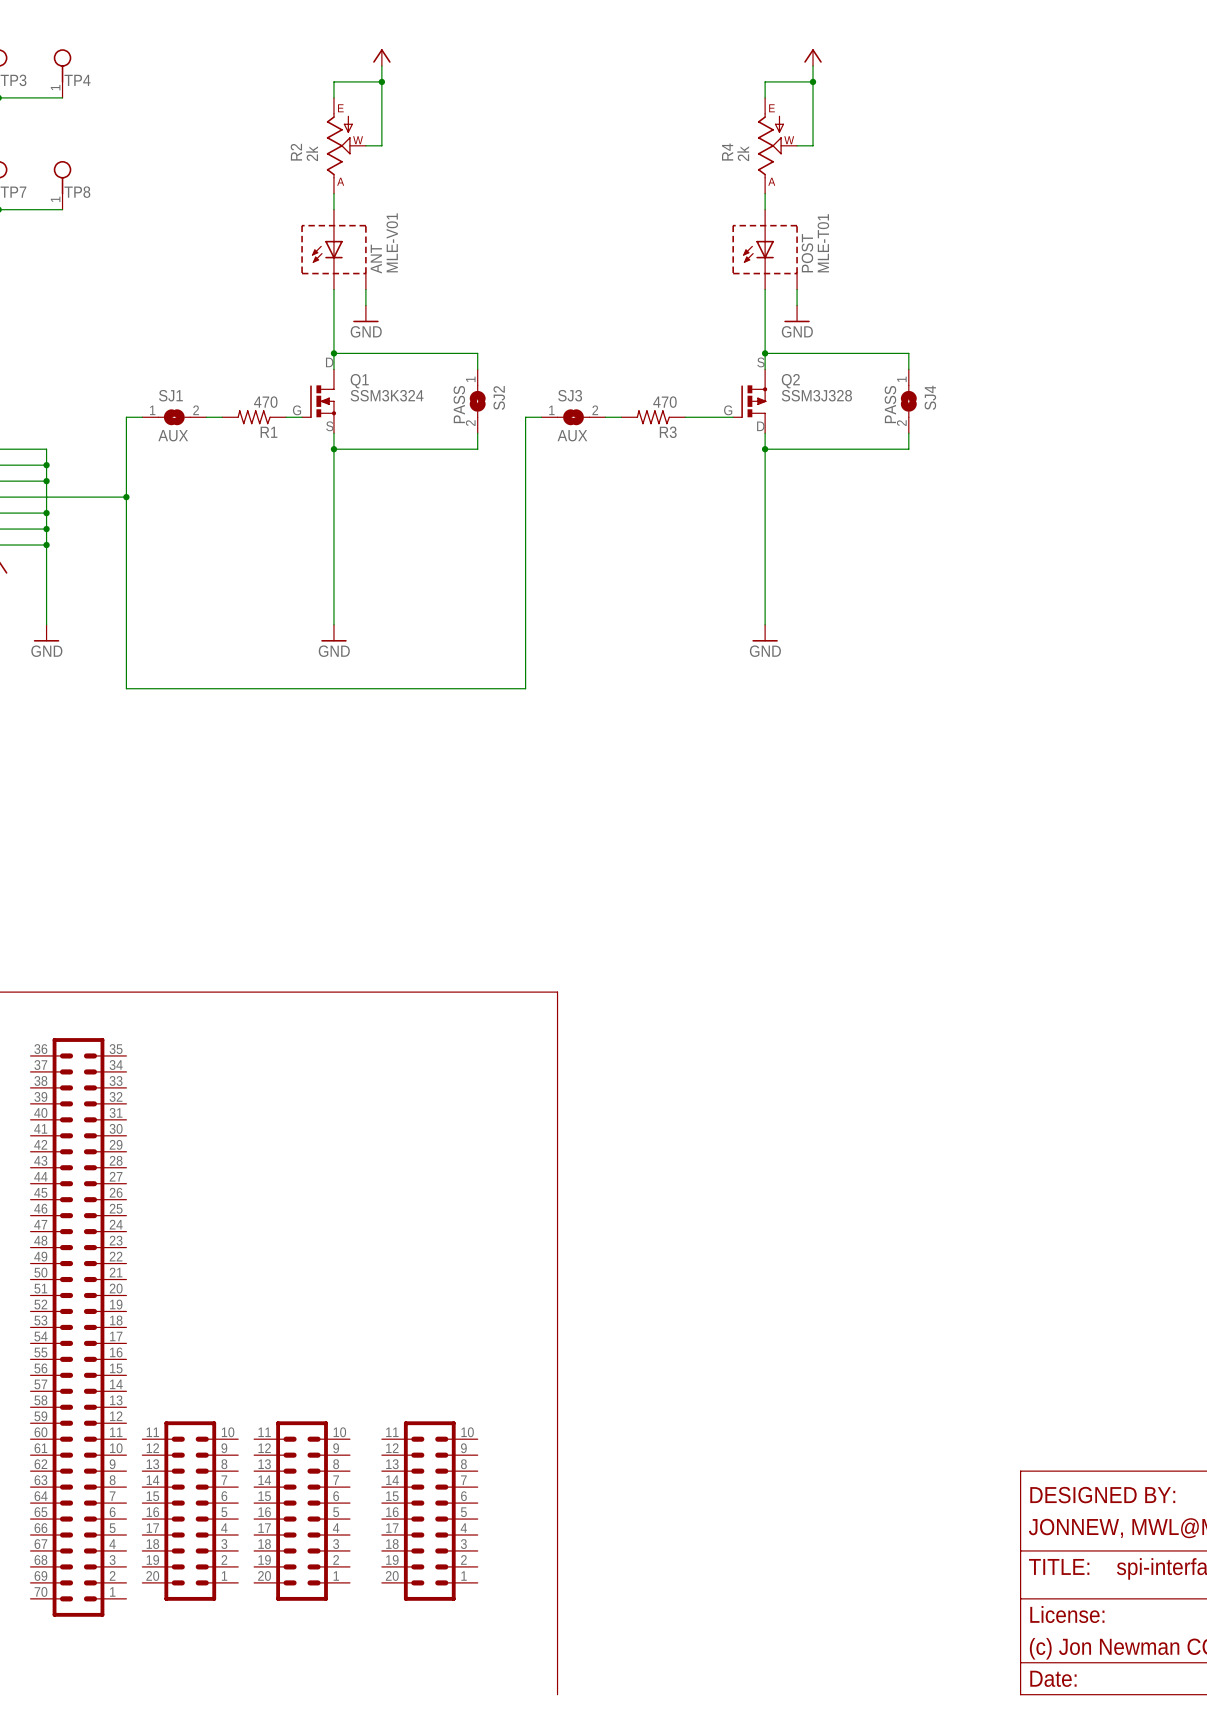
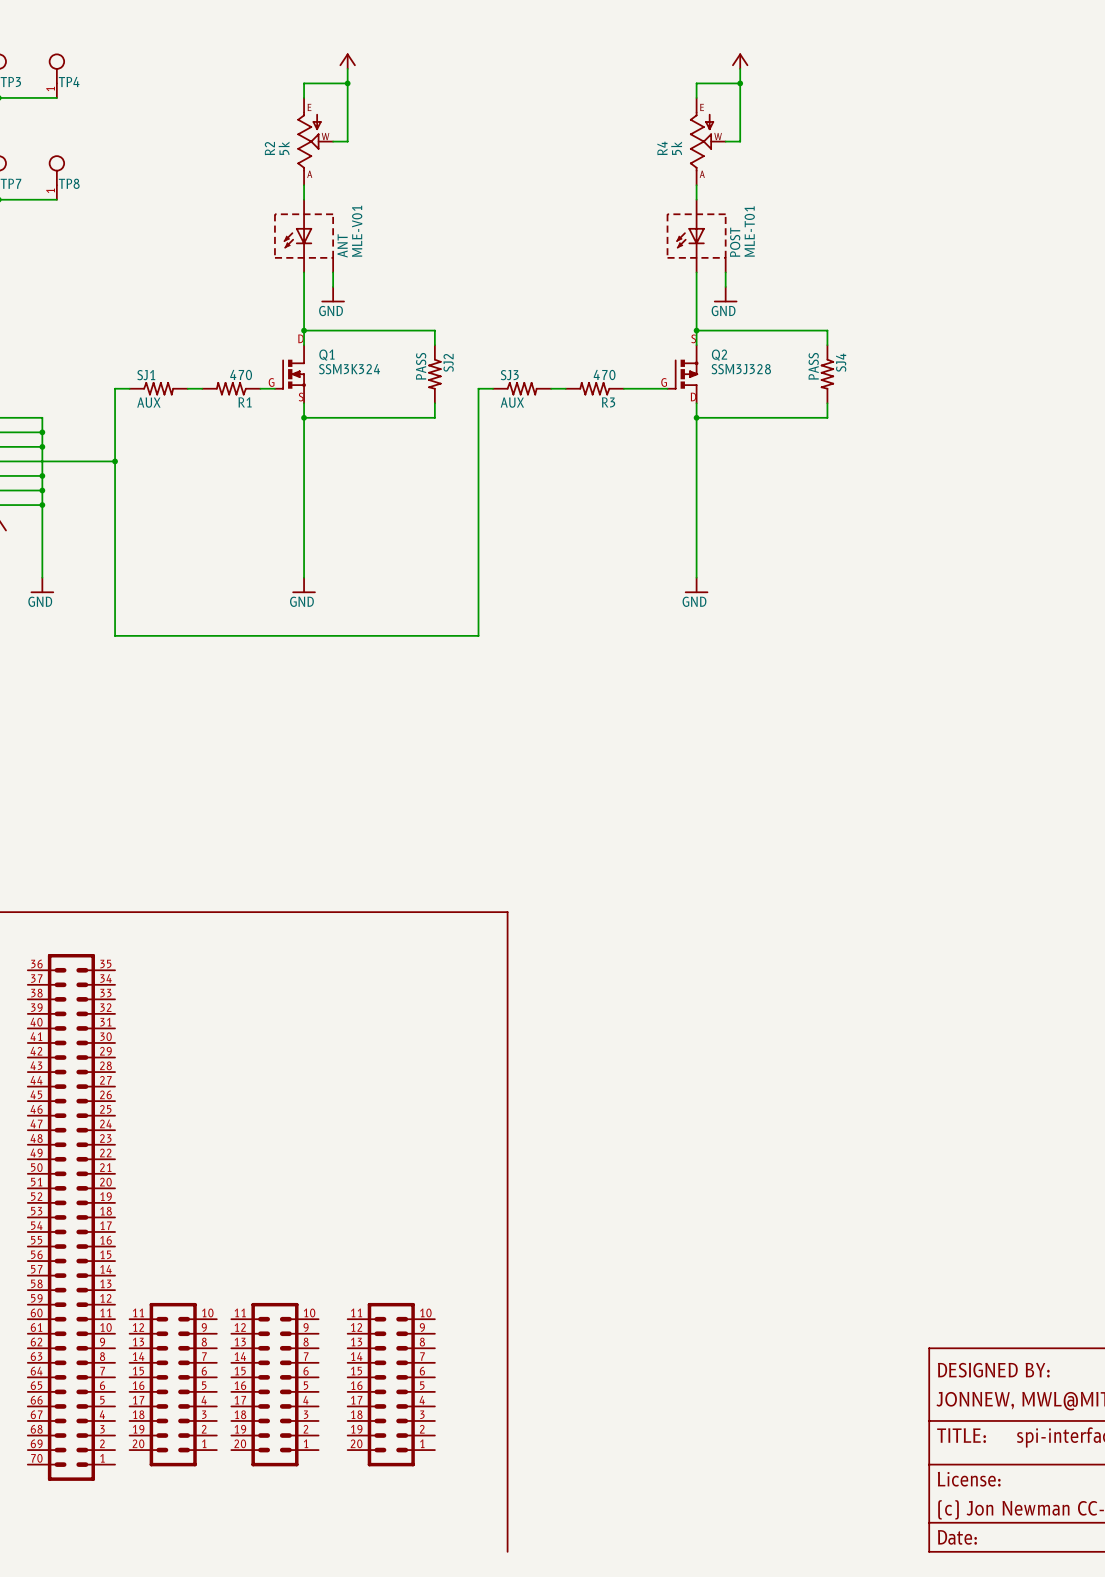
R2 value: 2k (312, 153) -> 5k (284, 148)
R4 value: 2k (743, 153) -> 5k (676, 148)
SJ2 symbol: [469, 369, 486, 434] -> [428, 345, 442, 404]
SJ4 symbol: [900, 369, 917, 434] -> [821, 345, 834, 404]
SJ1 symbol: [142, 409, 207, 426] -> [129, 382, 188, 396]
SJ3 symbol: [541, 409, 606, 426] -> [493, 382, 552, 396]

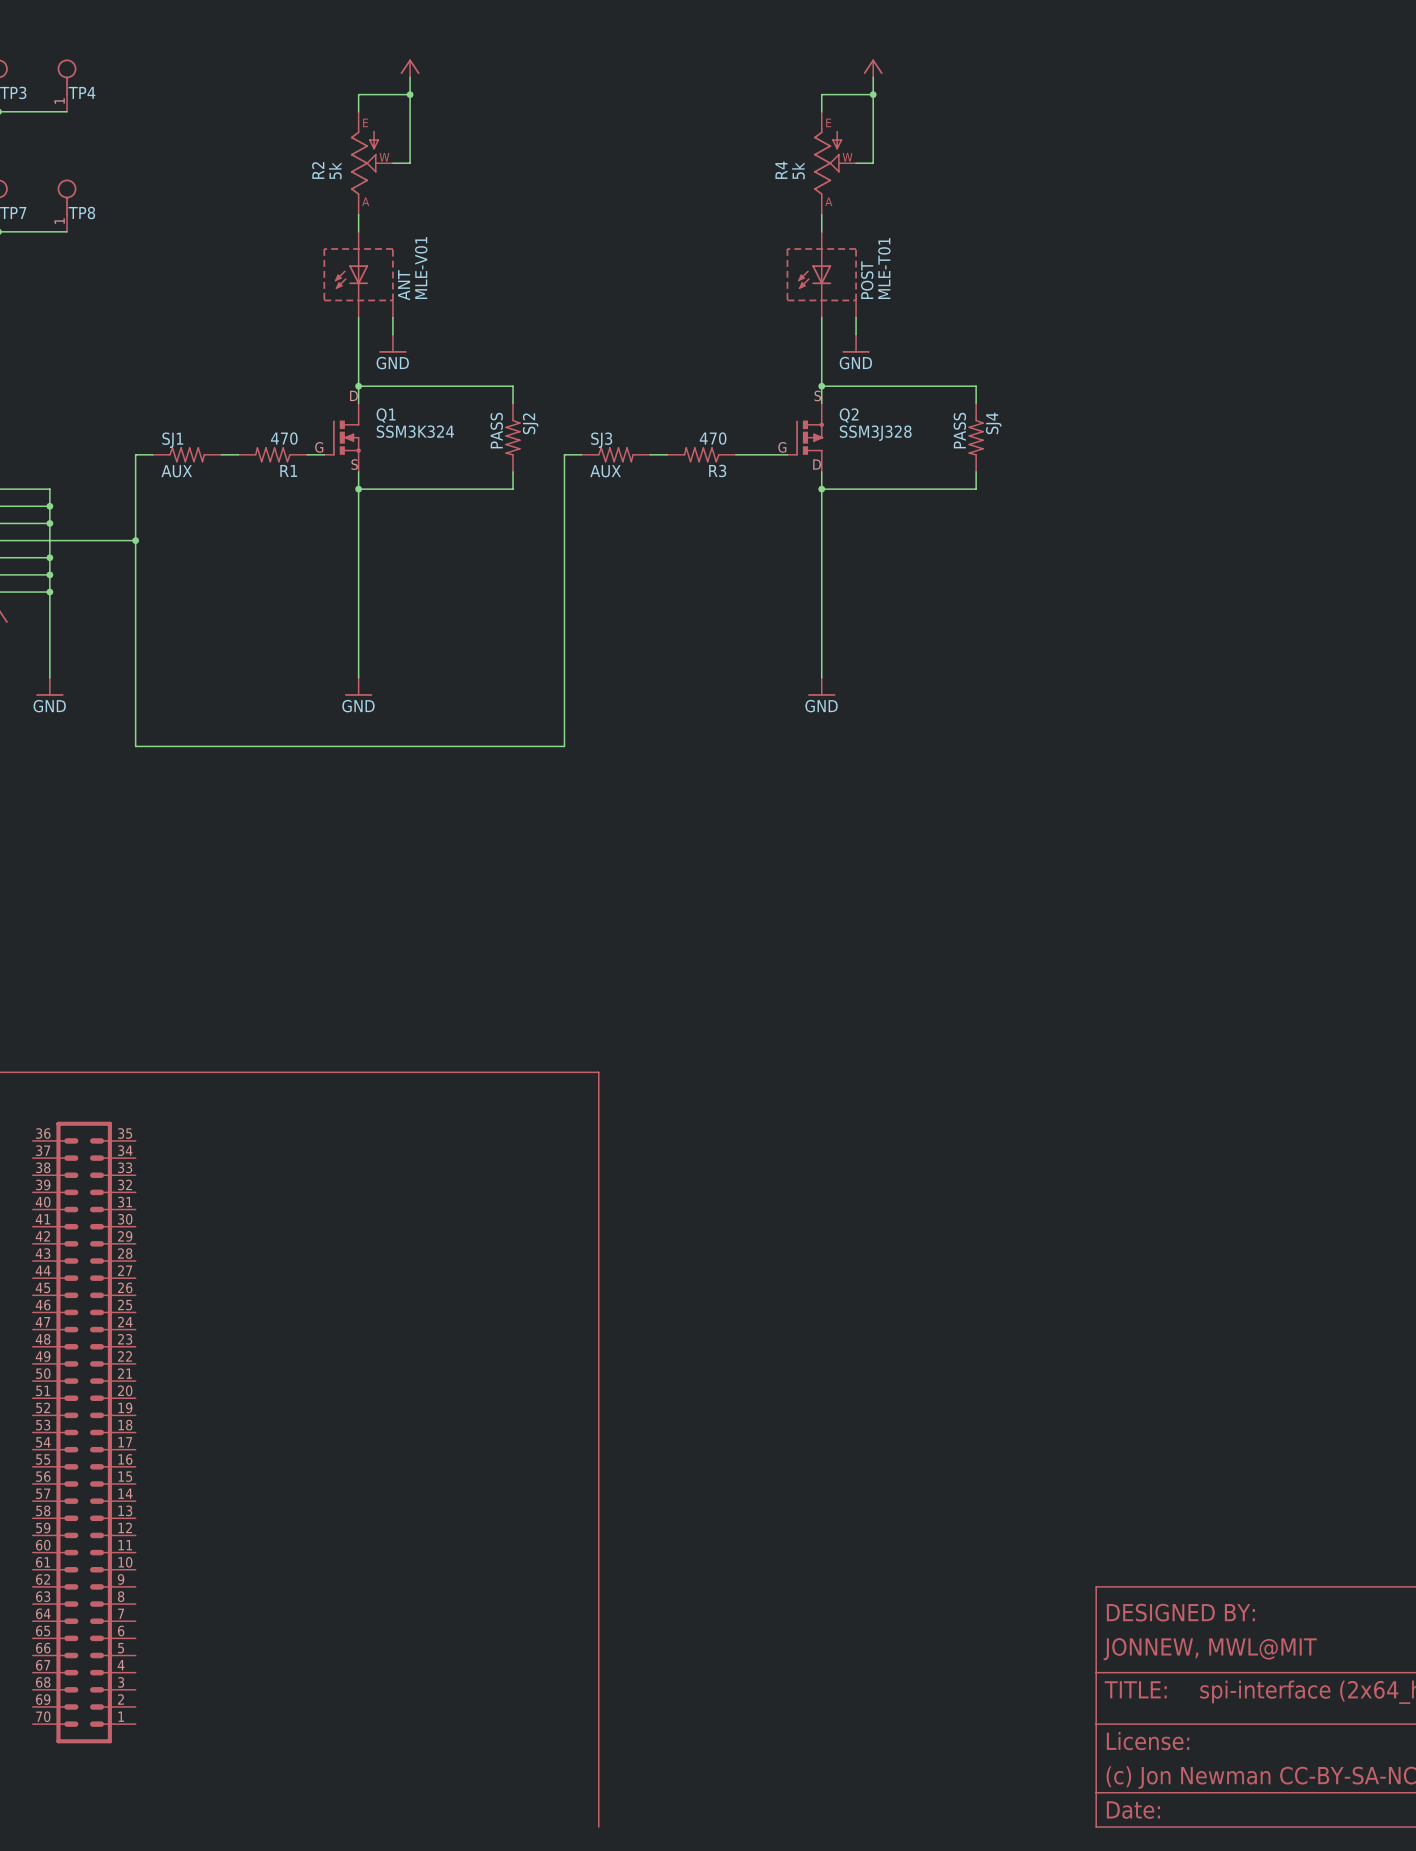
part: (173, 1384) -> none
part: (274, 1384) -> none
part: (391, 1384) -> none

